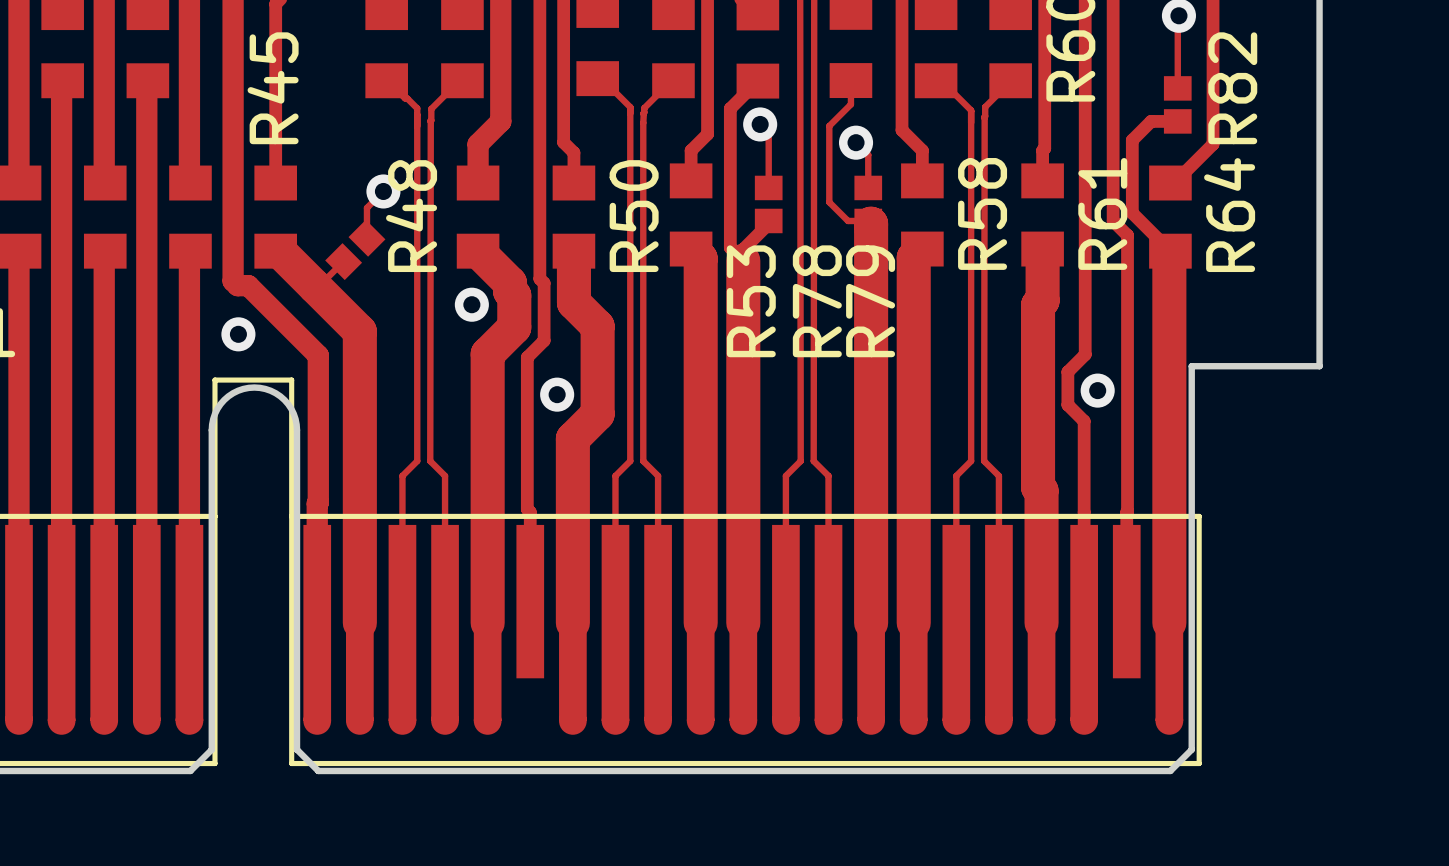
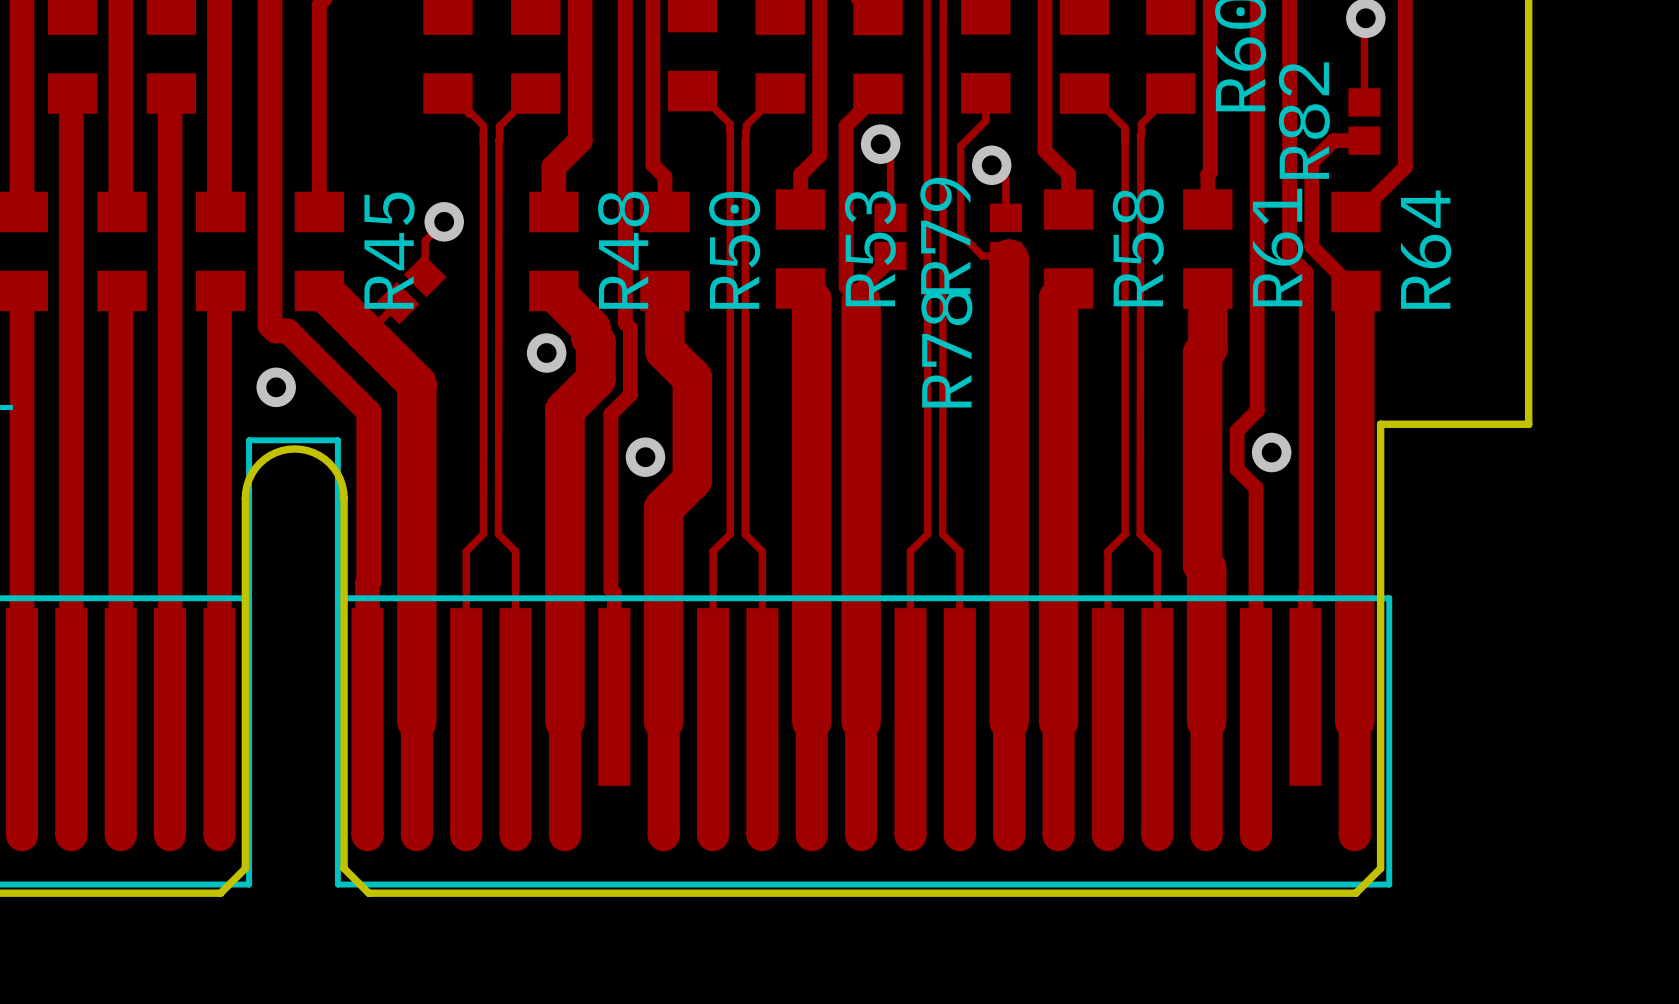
R45 name position: R45 (273, 88) -> R45 (389, 250)
R82 name position: R82 (1232, 88) -> R82 (1304, 120)
R48 name position: R48 (411, 216) -> R48 (623, 250)
R53 name position: R53 (751, 301) -> R53 (870, 248)
R79 name position: R79 (870, 301) -> R79 (945, 235)

